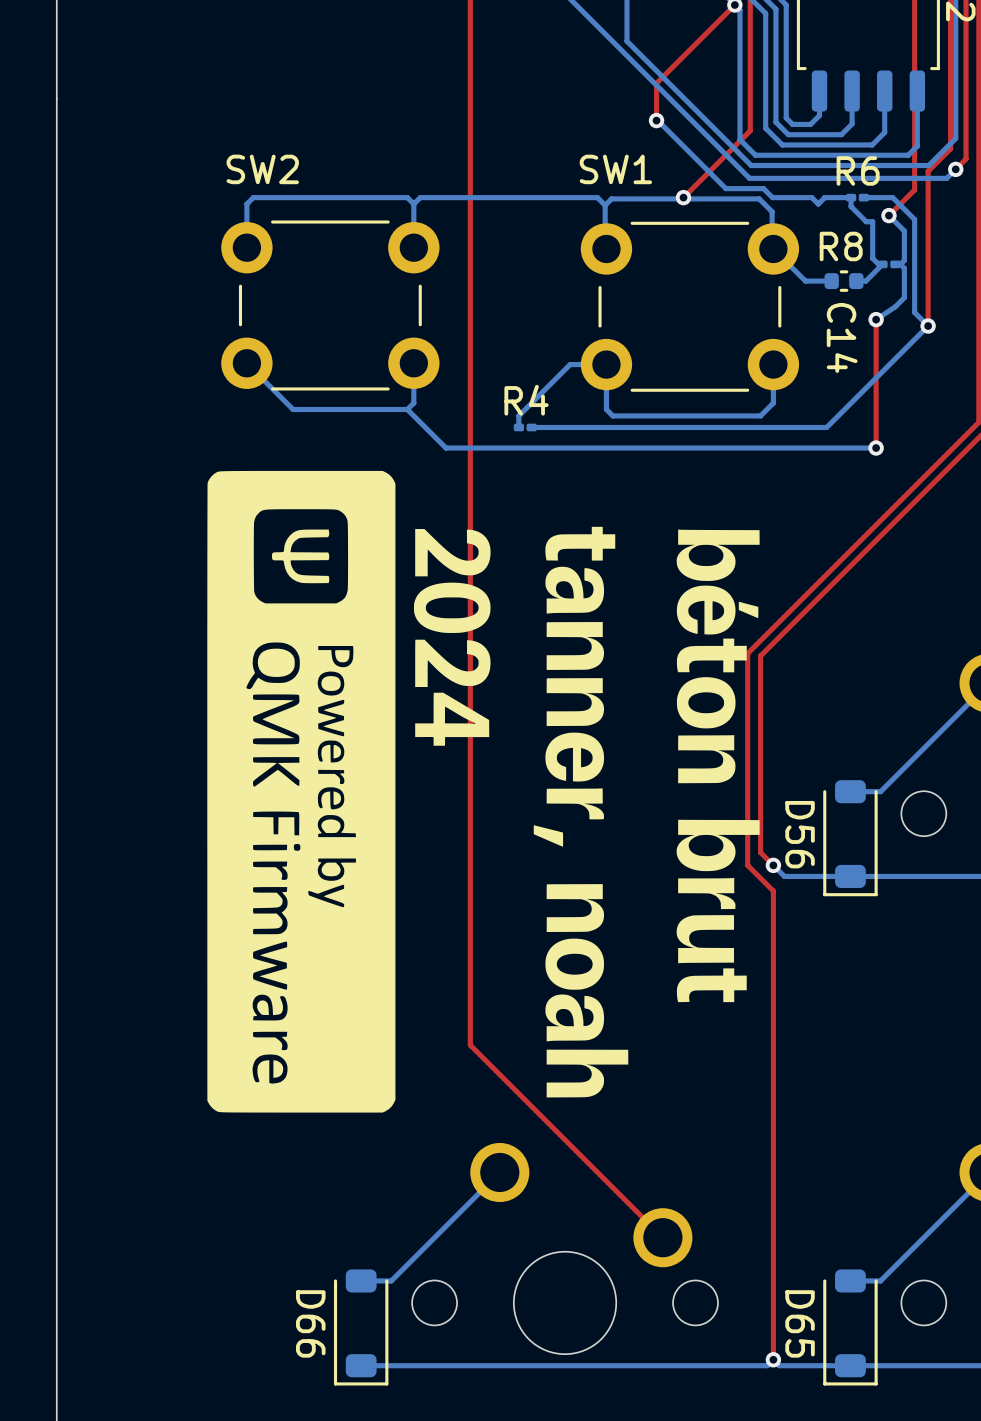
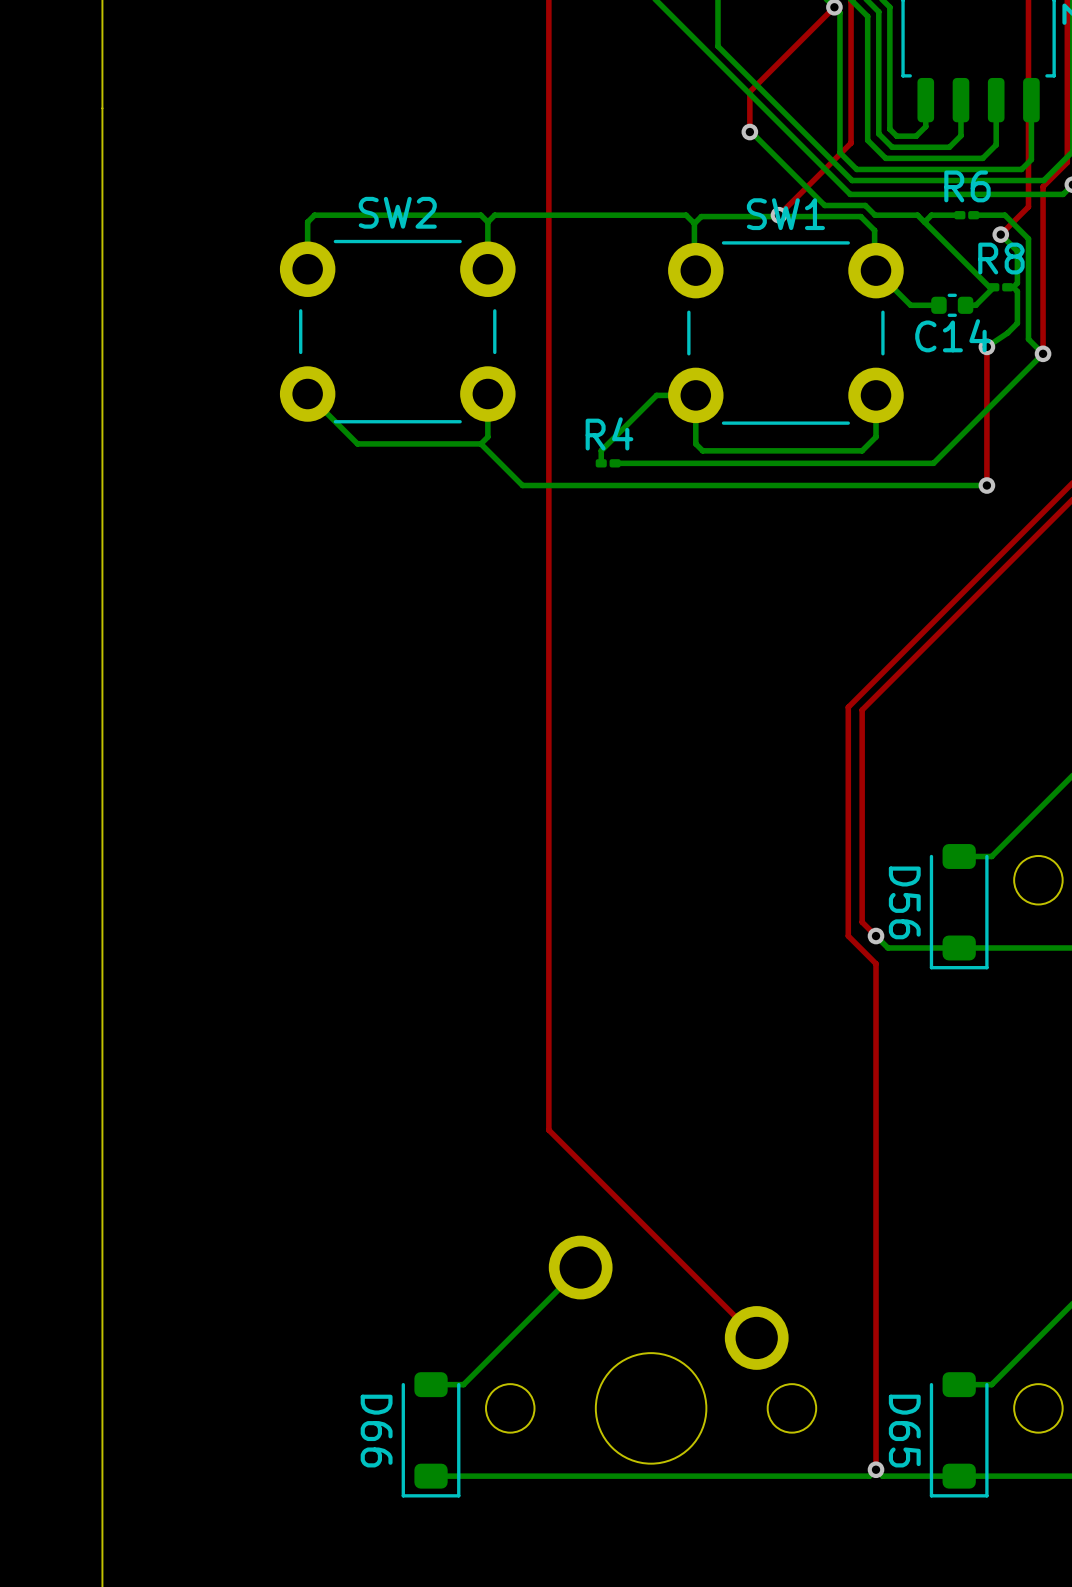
SW2 name position: SW2 (262, 169) -> SW2 (397, 212)
SW1 name position: SW1 (615, 169) -> SW1 (785, 214)
bottom track: (851, 197) (851, 206) (866, 221) (872, 221) (872, 258) -> (924, 222) (983, 280)
R8 name position: R8 (841, 246) -> R8 (1001, 258)
C14 name rotation: 0° (842, 337) -> 90° counterclockwise (952, 335)
drawing: [207, 470, 760, 1113] -> none

